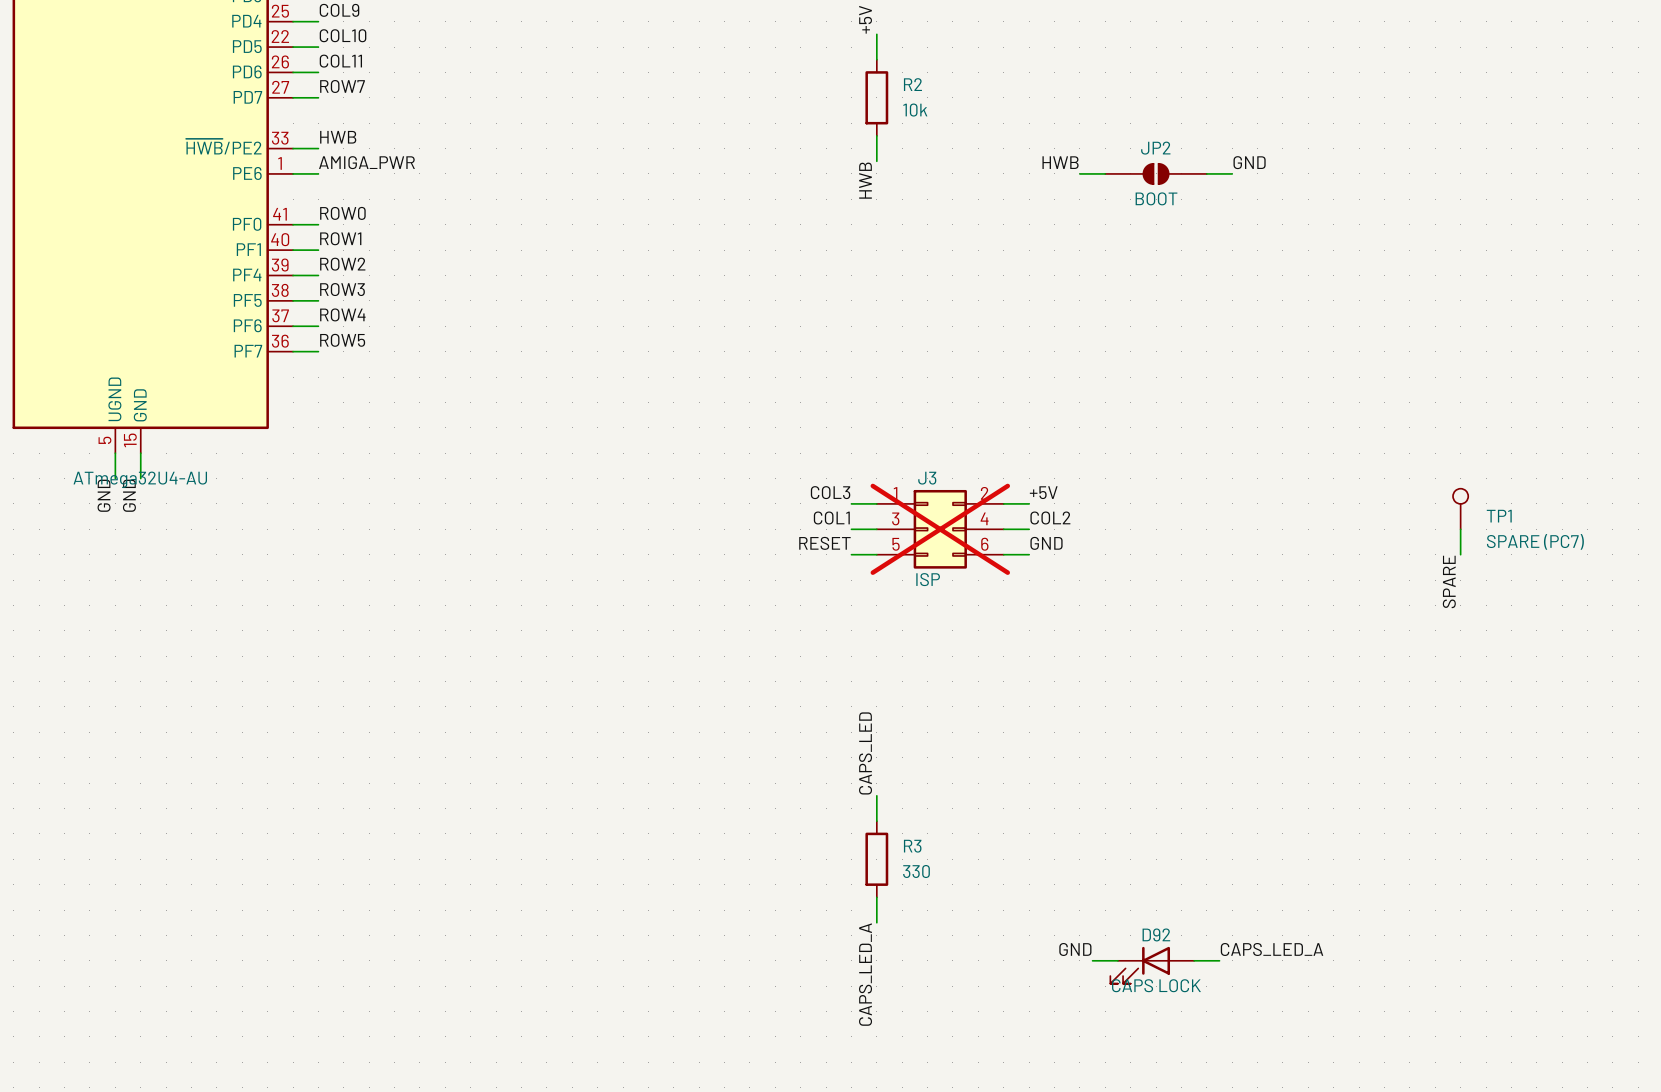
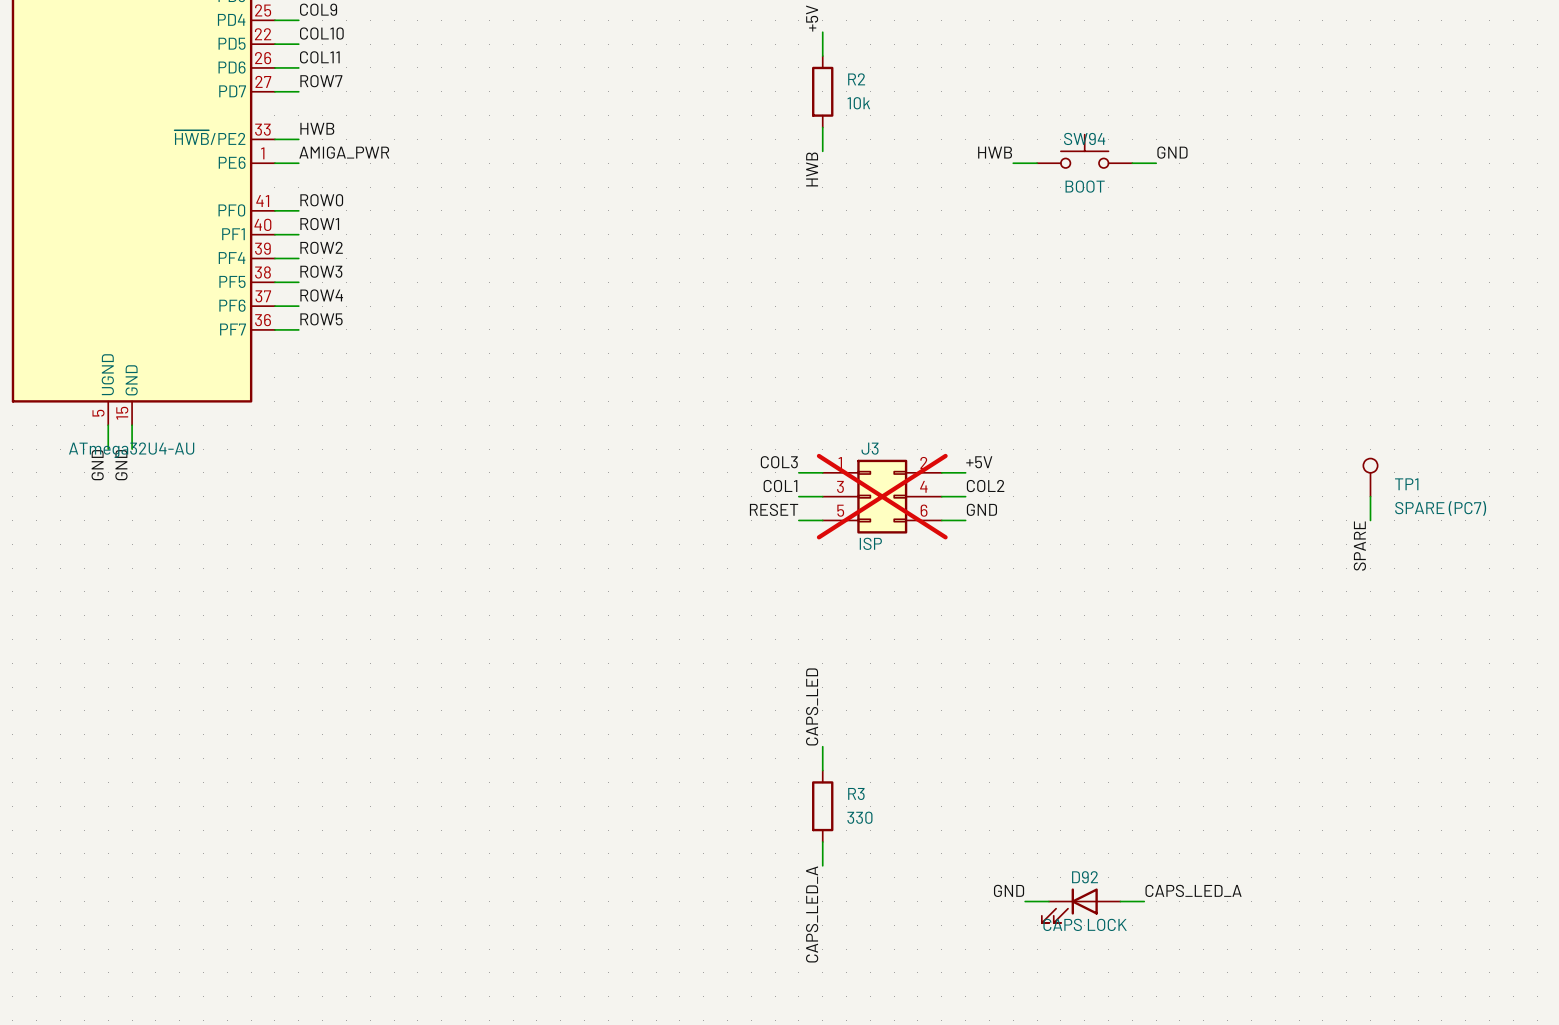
SW94: none -> BOOT (1084, 151)
JP2: BOOT (1156, 173) -> none

